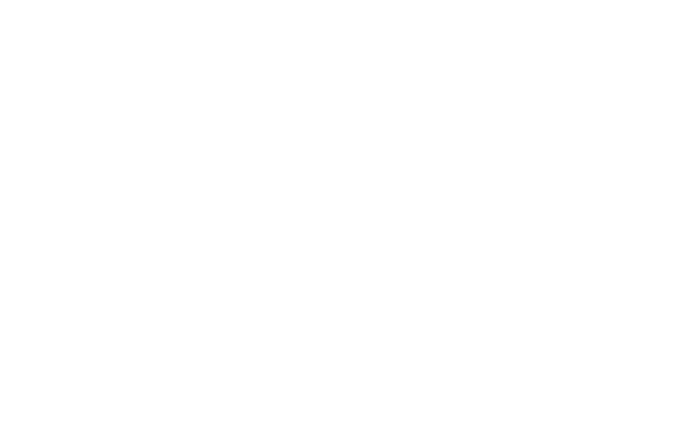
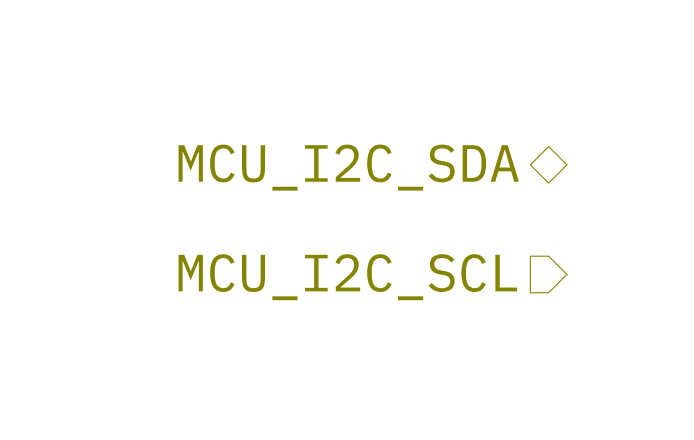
hierarchical label: none -> MCU_I2C_SDA (348, 167)
hierarchical label: none -> MCU_I2C_SCL (347, 277)

